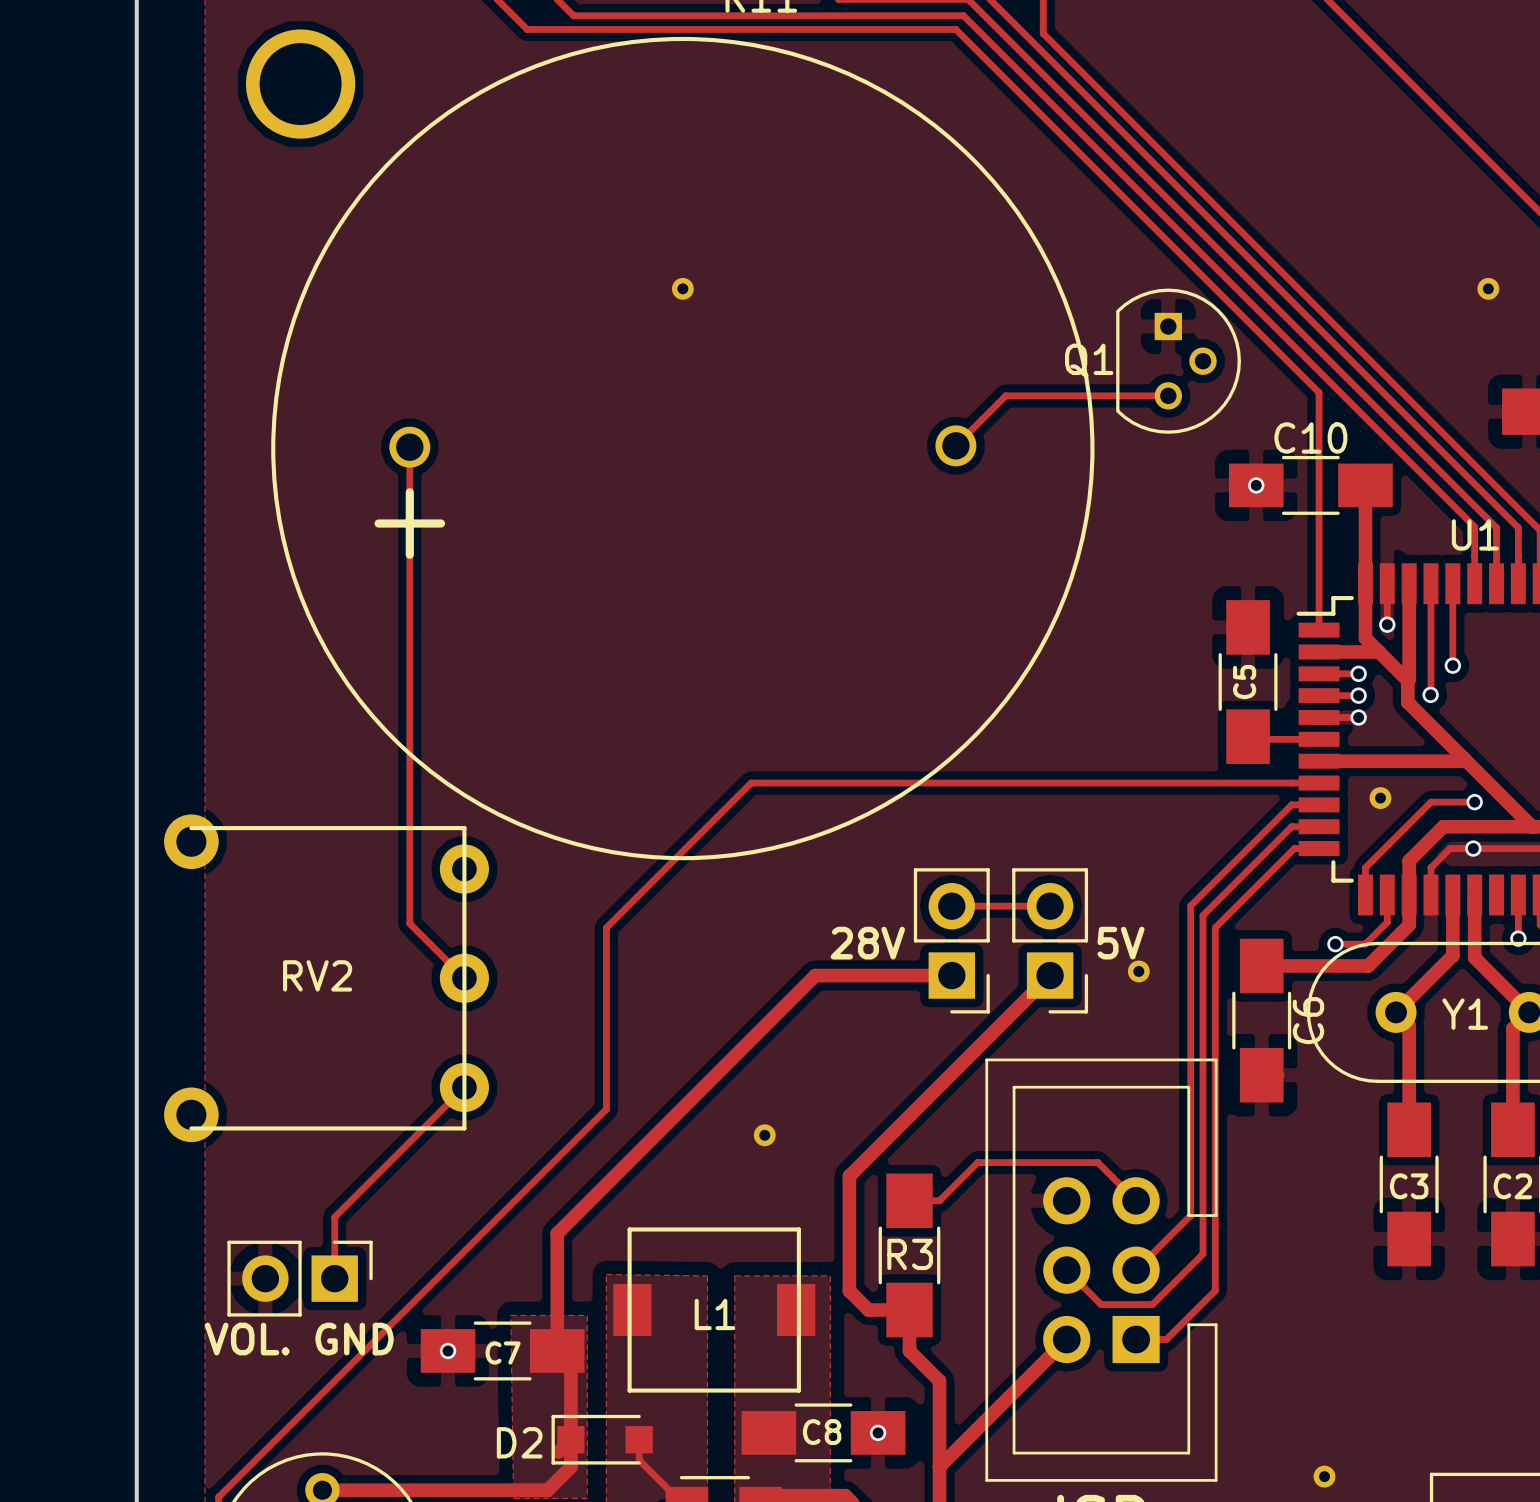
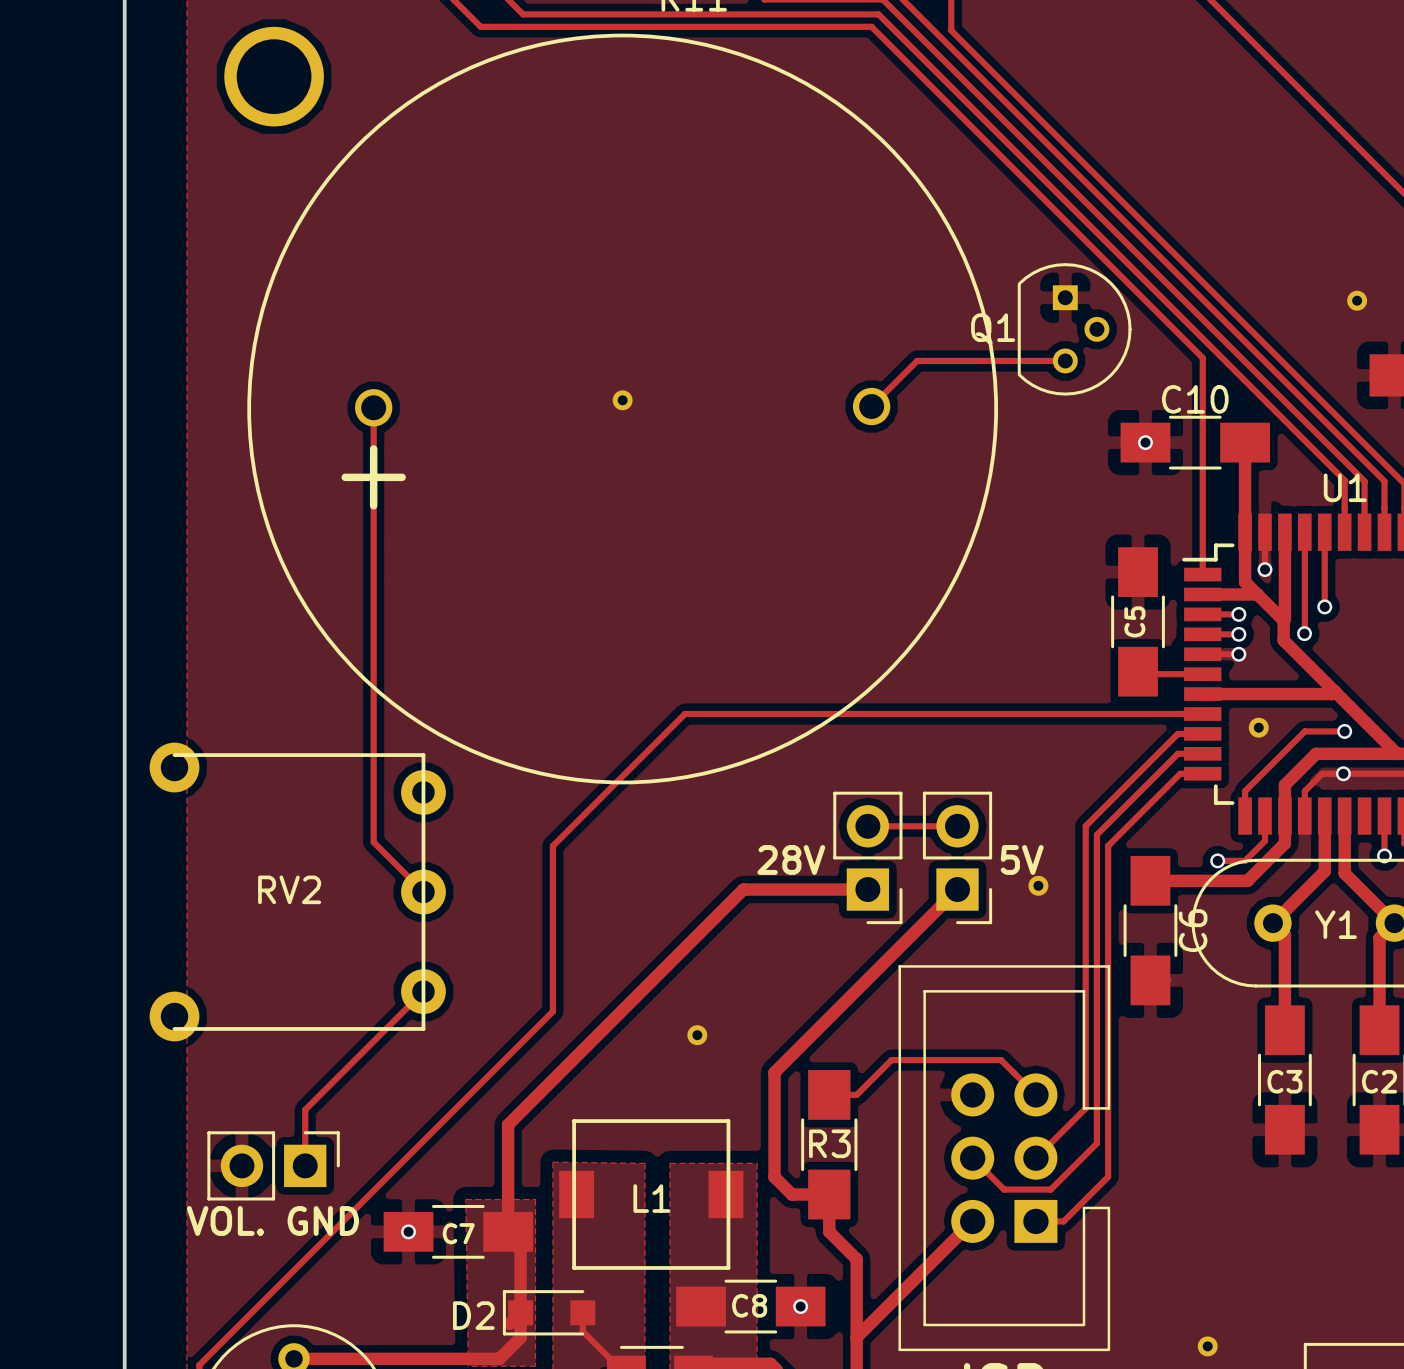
part position: (682, 288) -> (622, 400)
part position: (1488, 288) -> (1357, 300)

